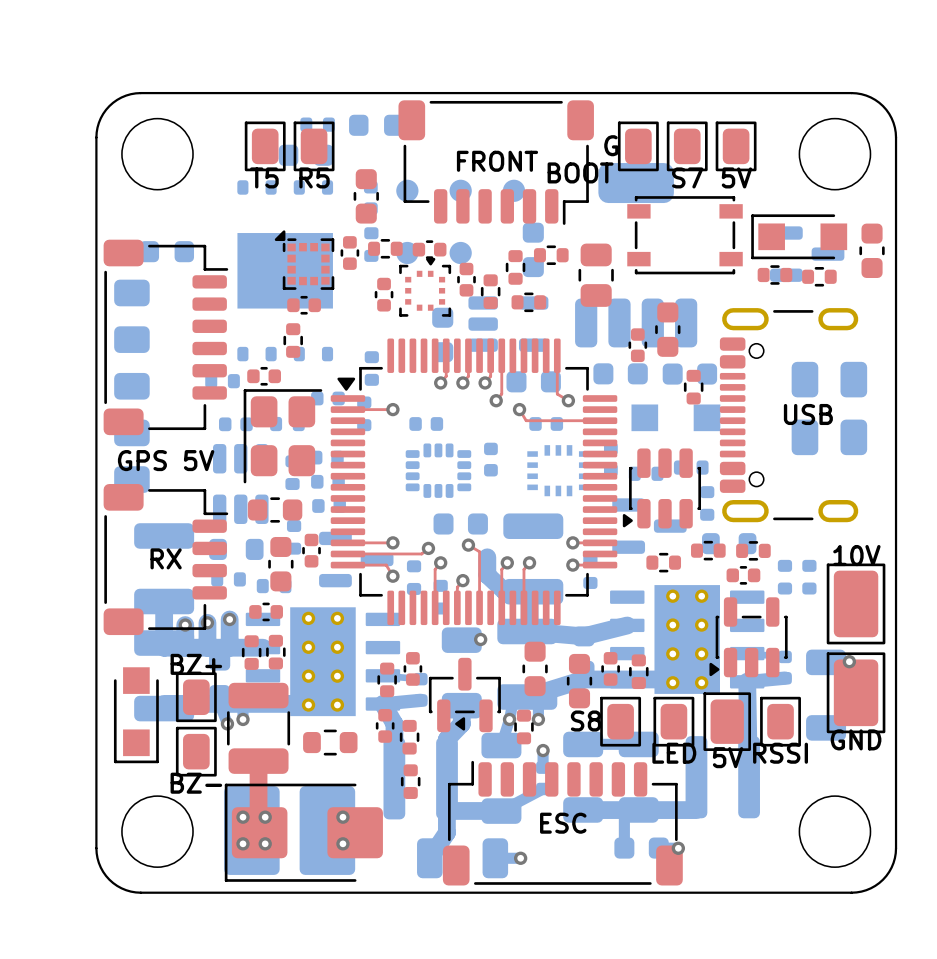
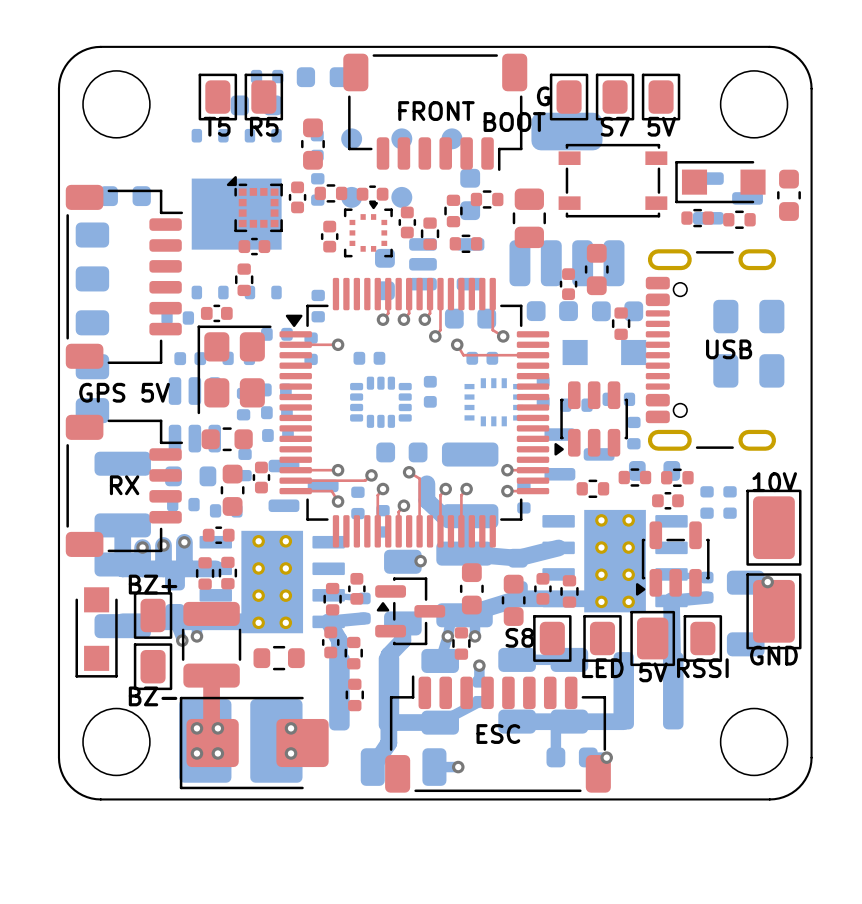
part rotation: 0° (464, 695) -> 90° clockwise (410, 611)

